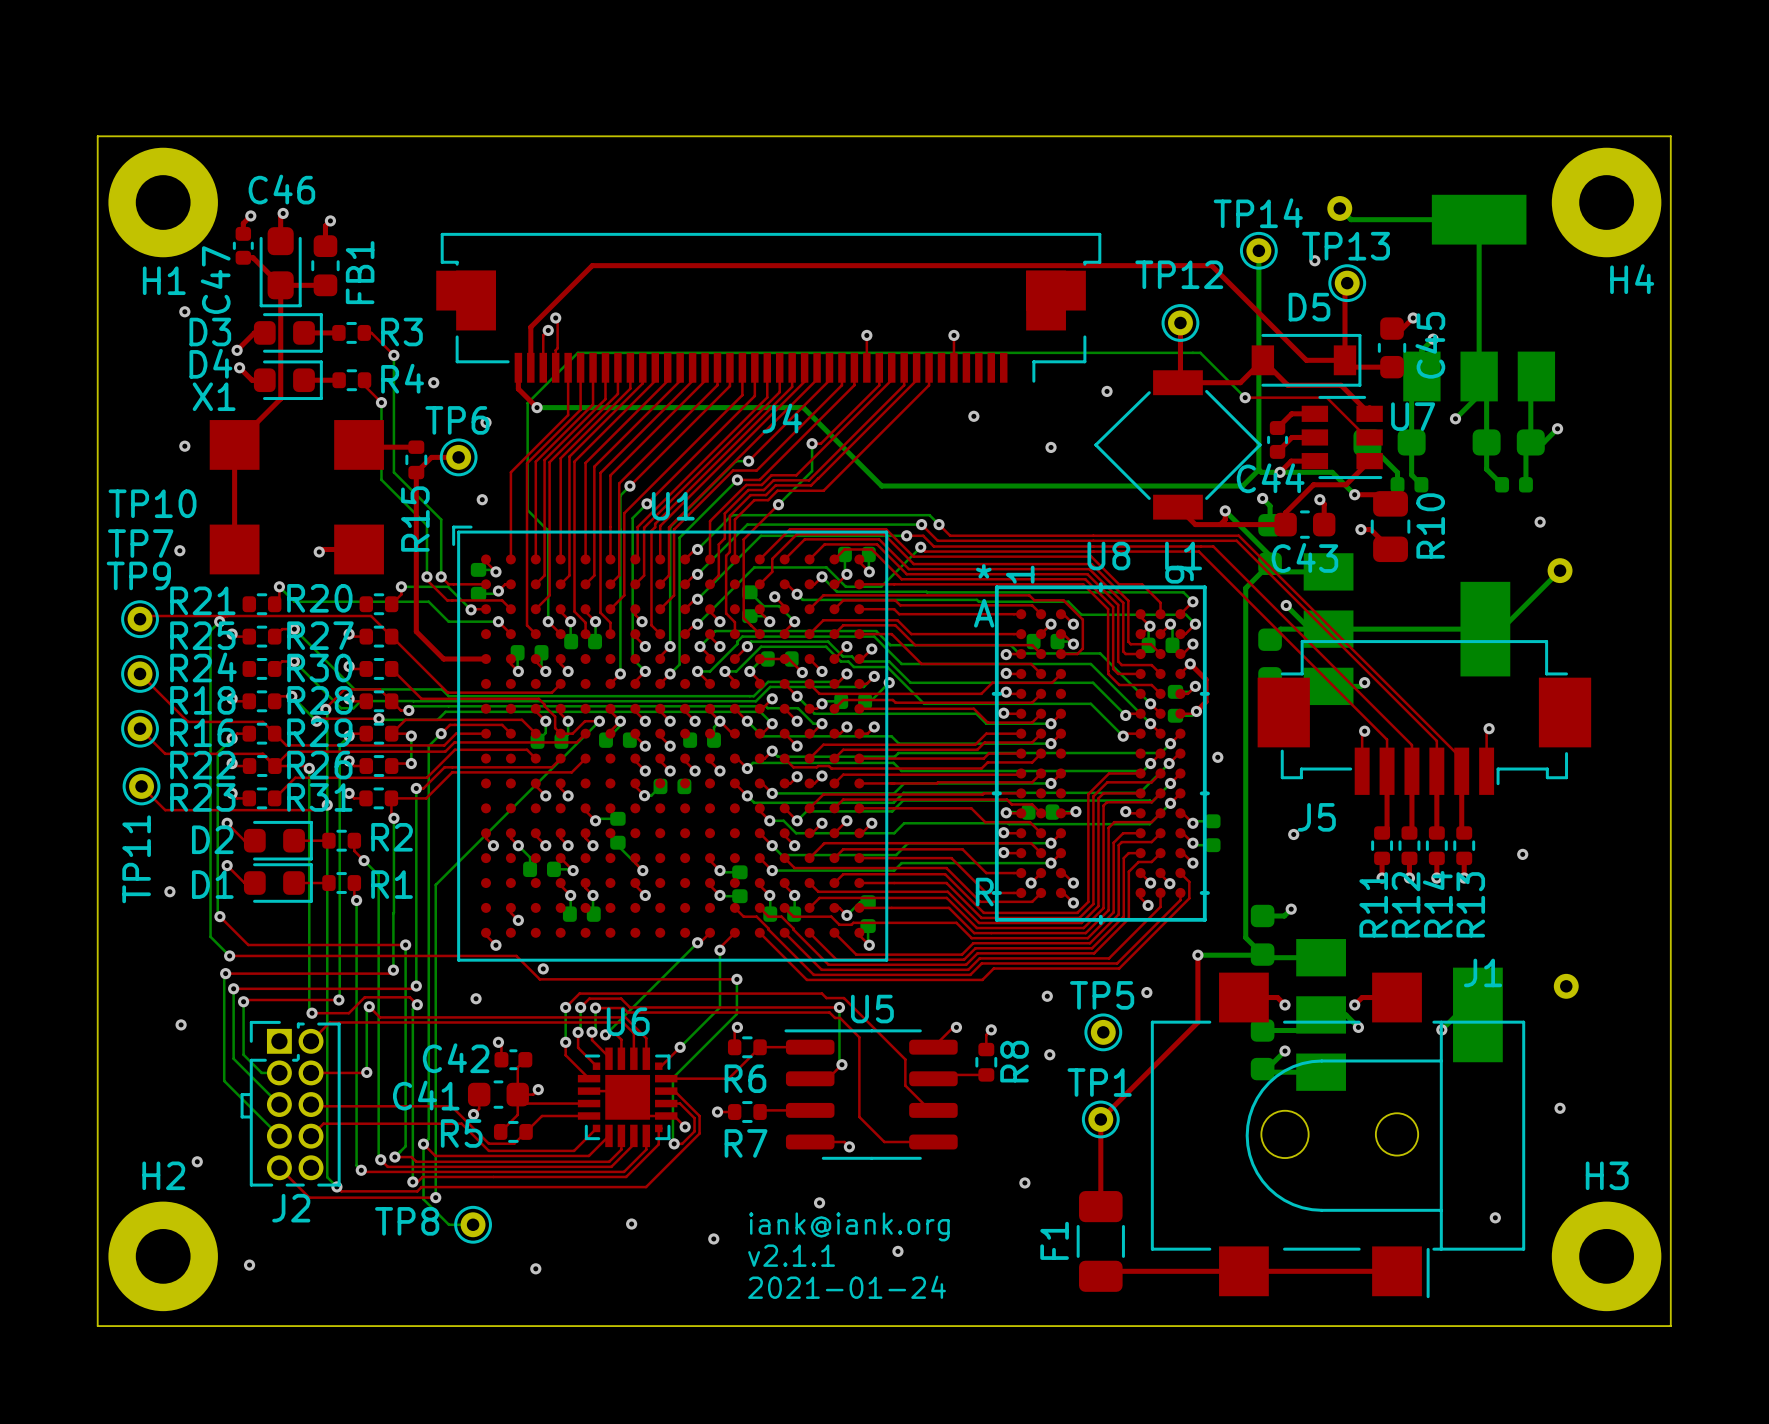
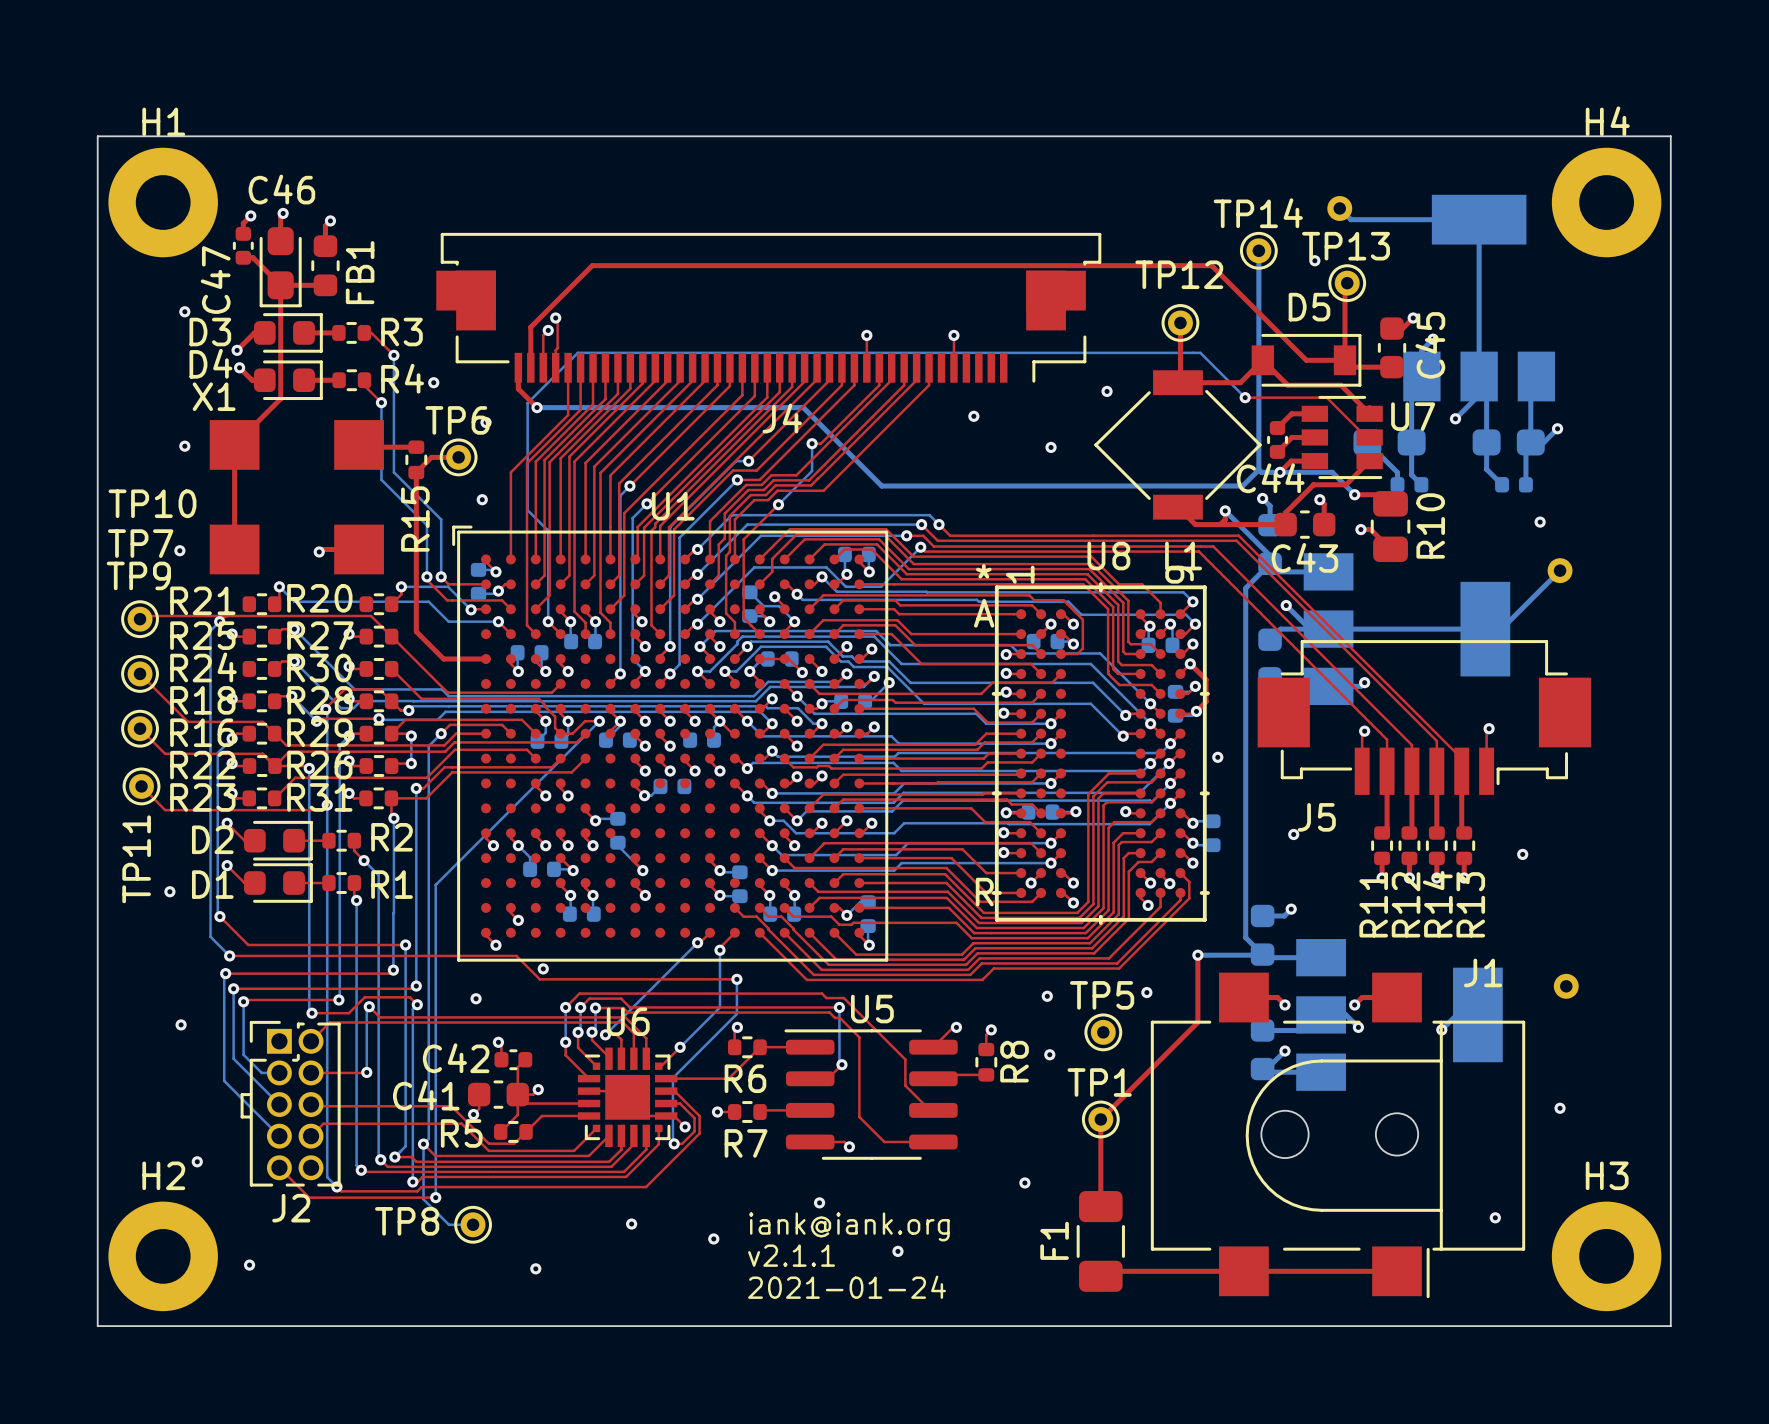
H4 name position: H4 (1632, 279) -> H4 (1607, 121)
H1 name position: H1 (164, 280) -> H1 (163, 121)

